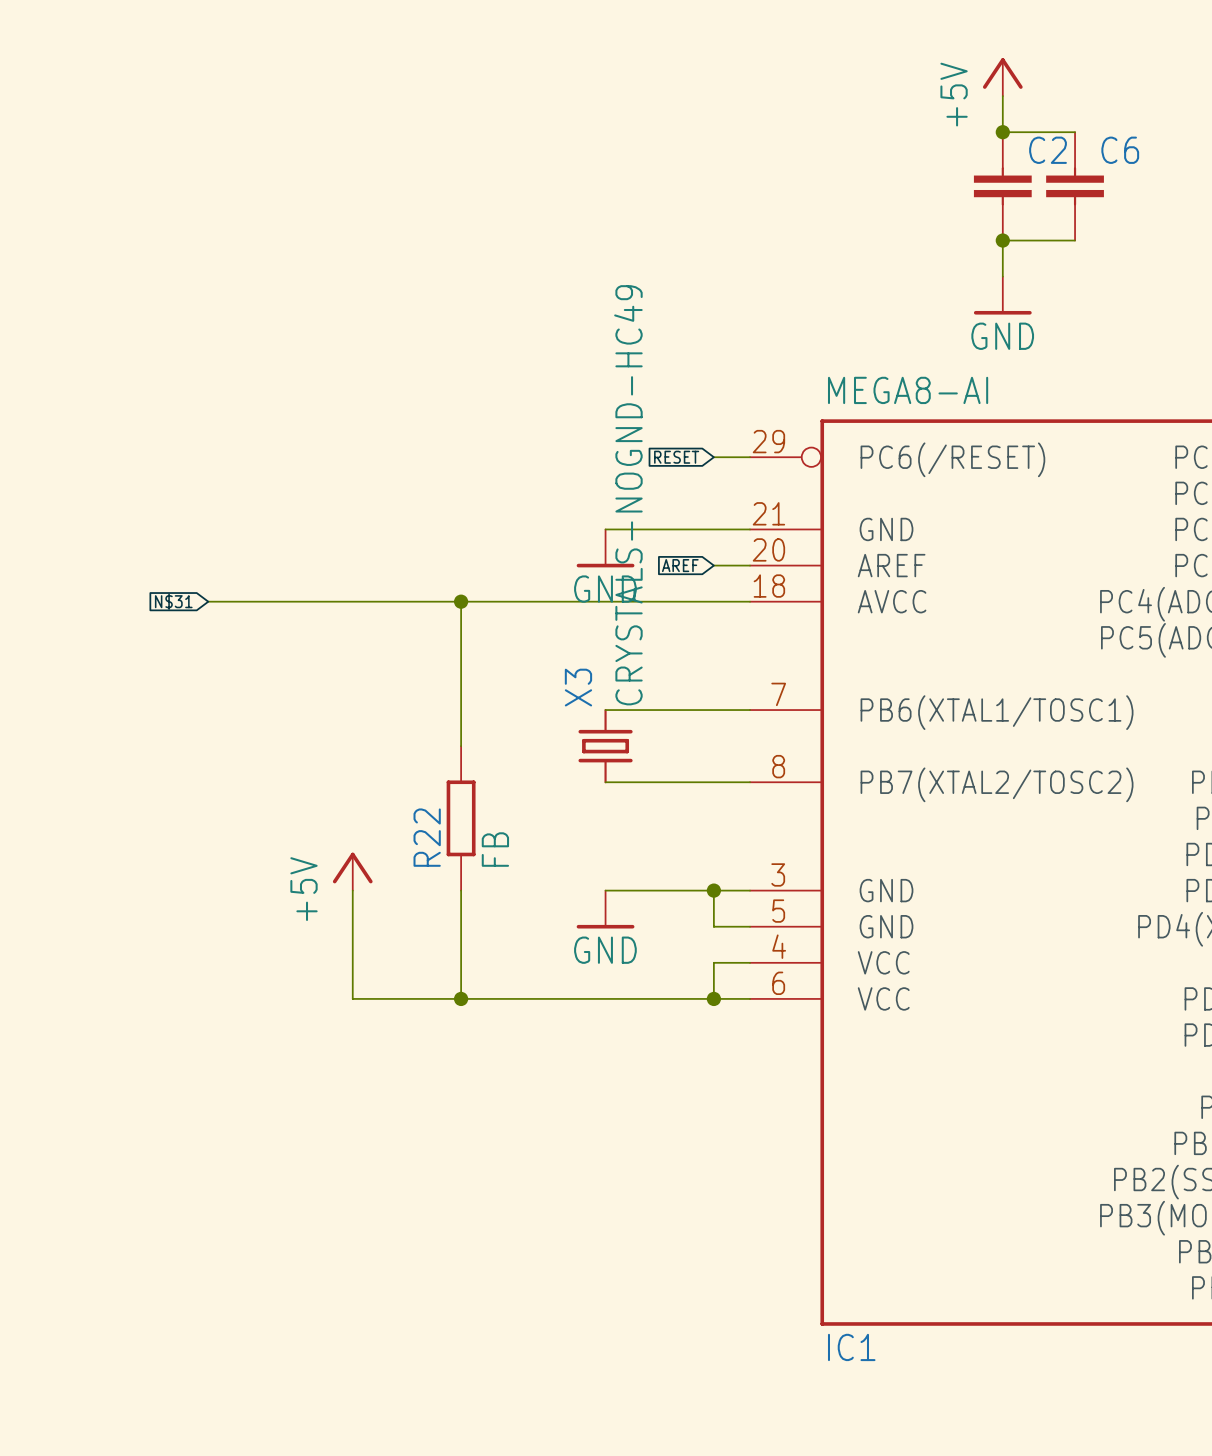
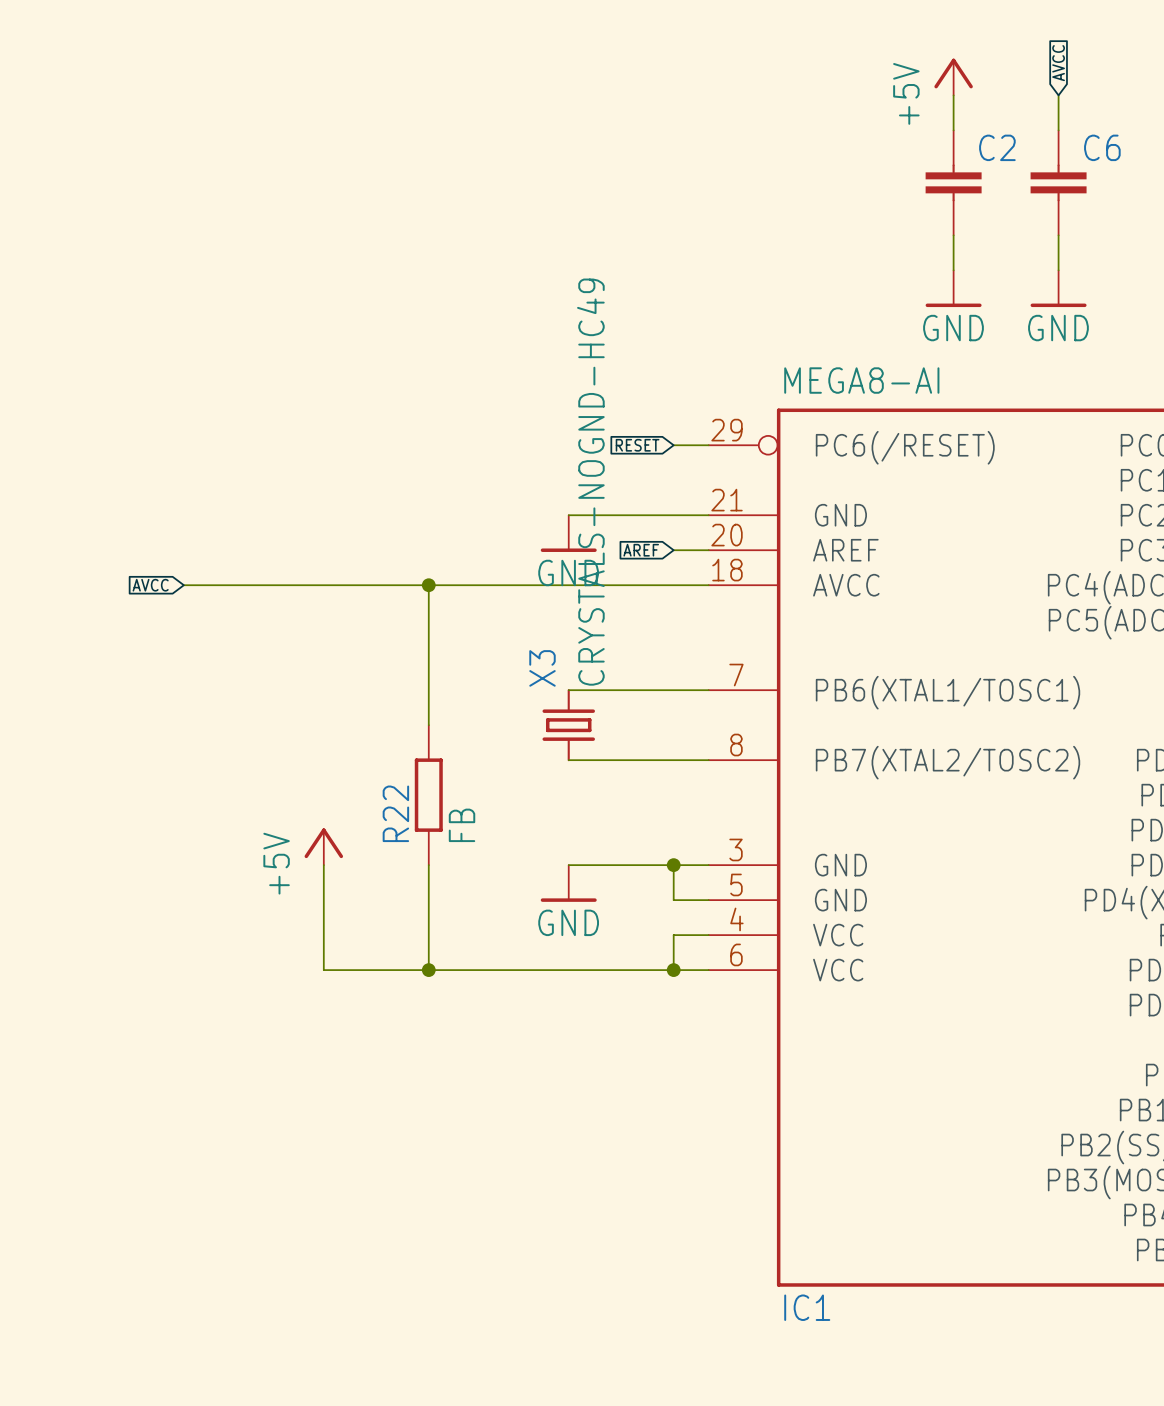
global label: none -> AVCC (1058, 63)
wire: none -> (1058, 95) (1058, 130)
wire: (1002, 132) (1075, 132) -> none
junction: (1002, 132) -> none
C6 position: (1075, 186) -> (1058, 182)
wire: (1002, 240) (1075, 240) -> none
junction: (1002, 240) -> none
wire: none -> (1058, 235) (1058, 270)
power symbol: none -> GND (1058, 288)
global label: N$31 (173, 601) -> AVCC (150, 585)

